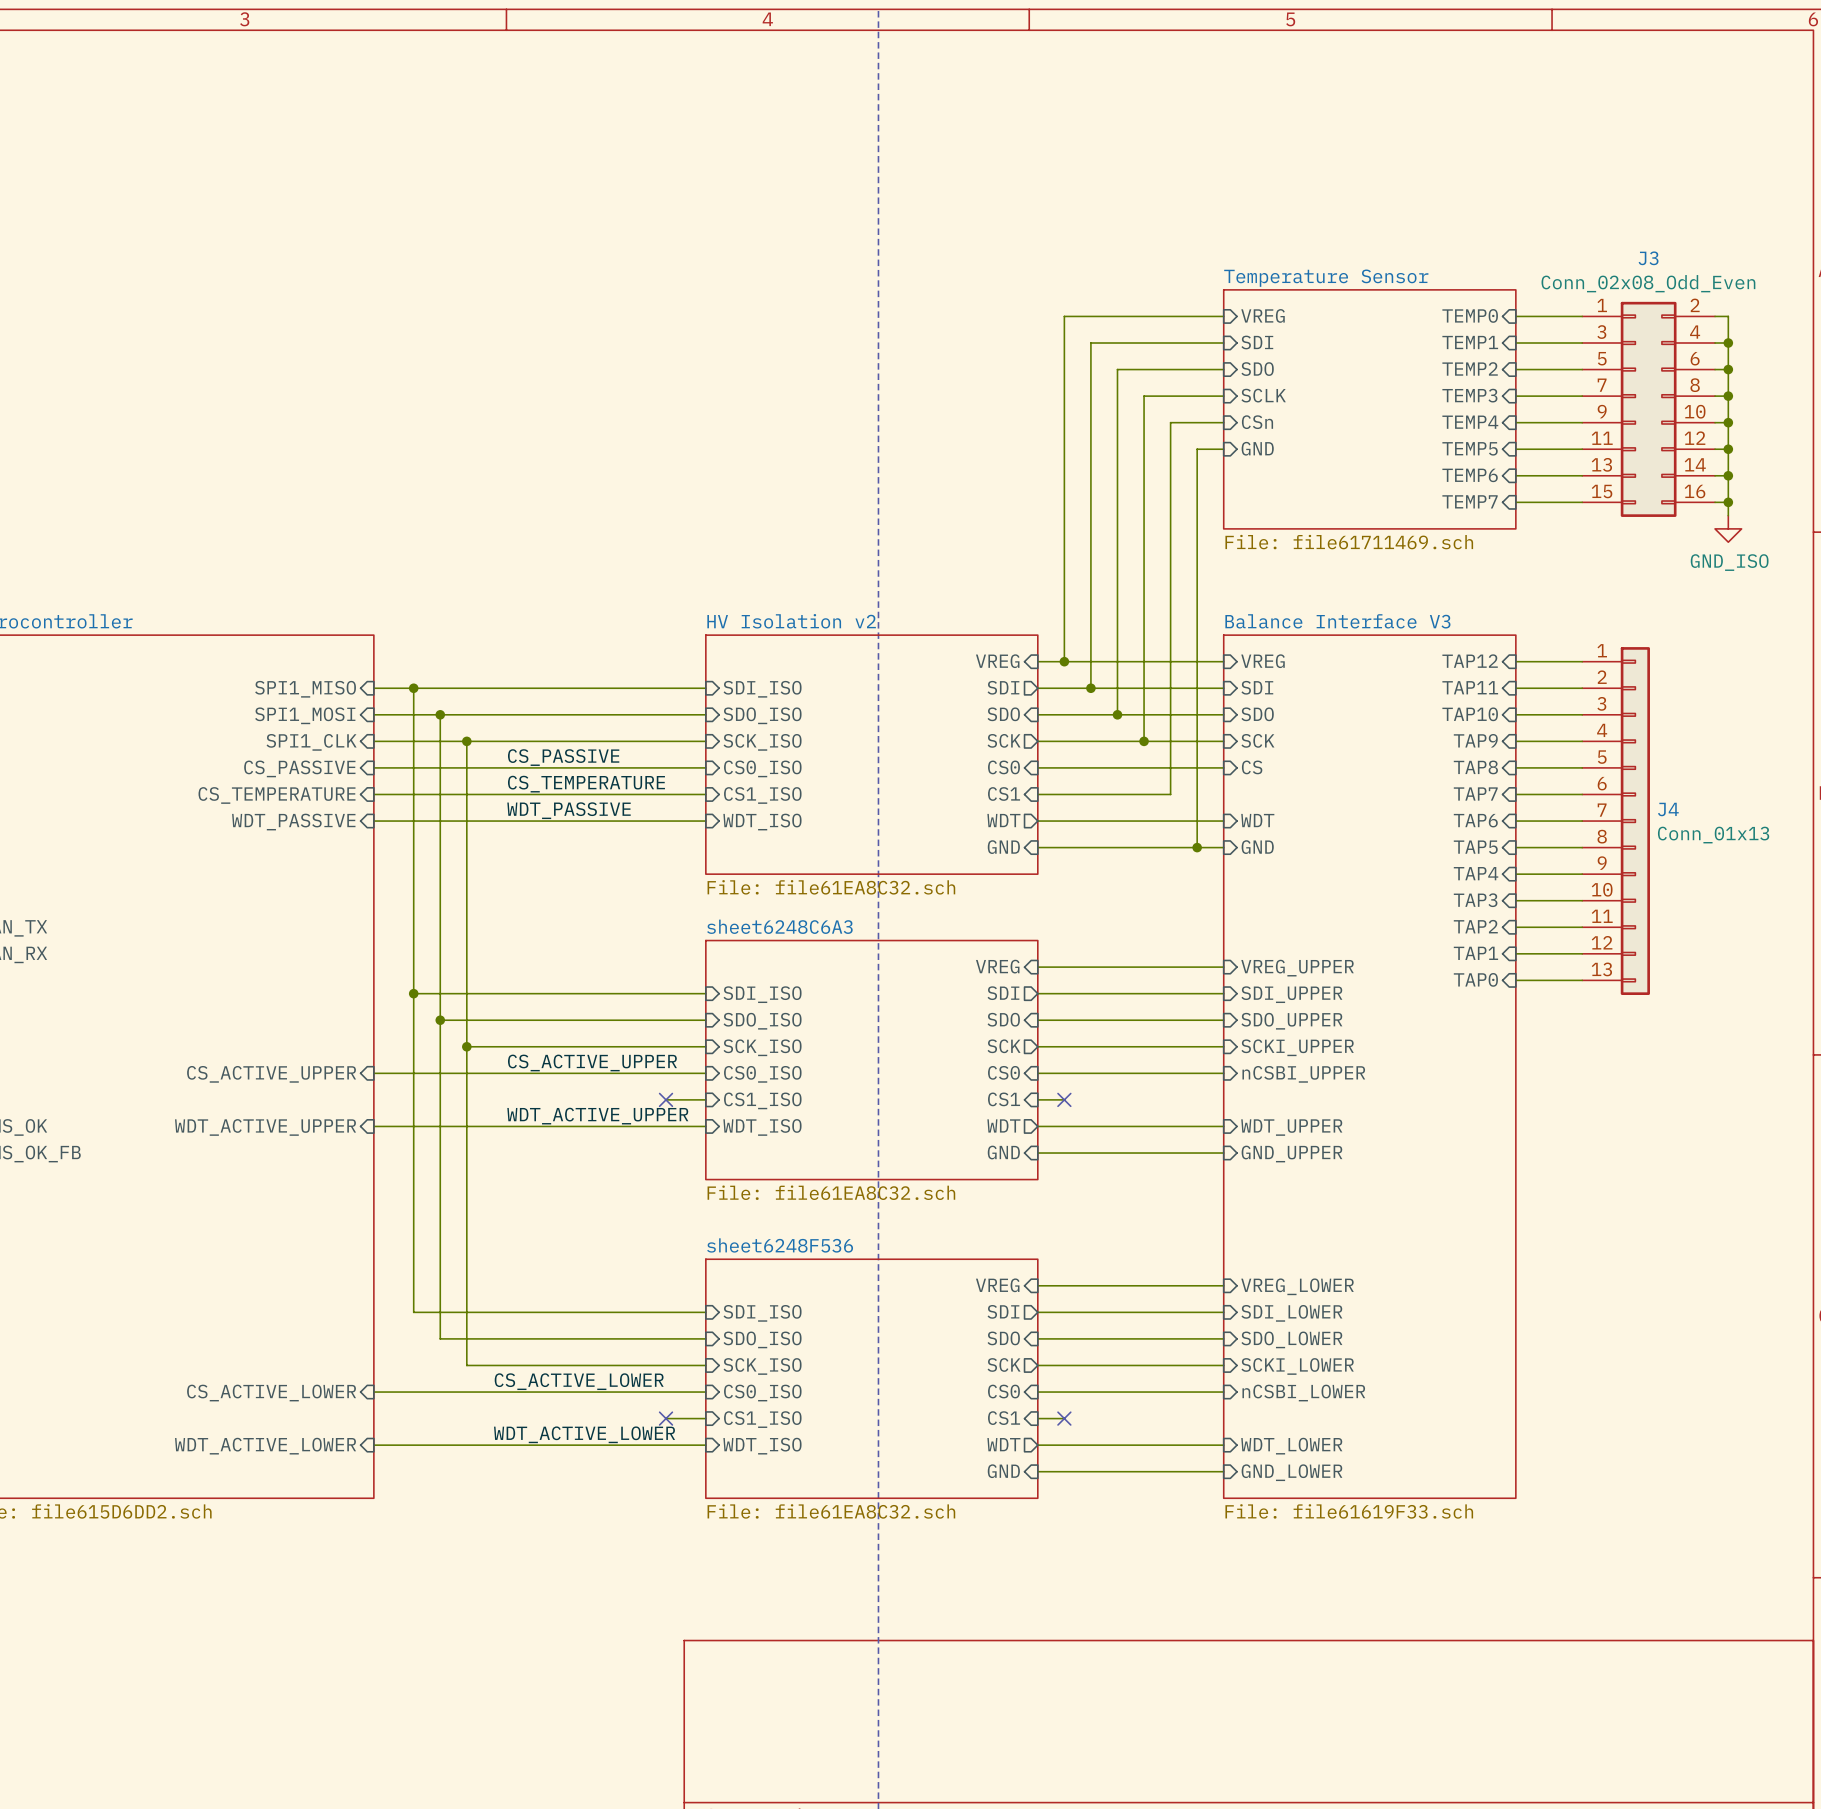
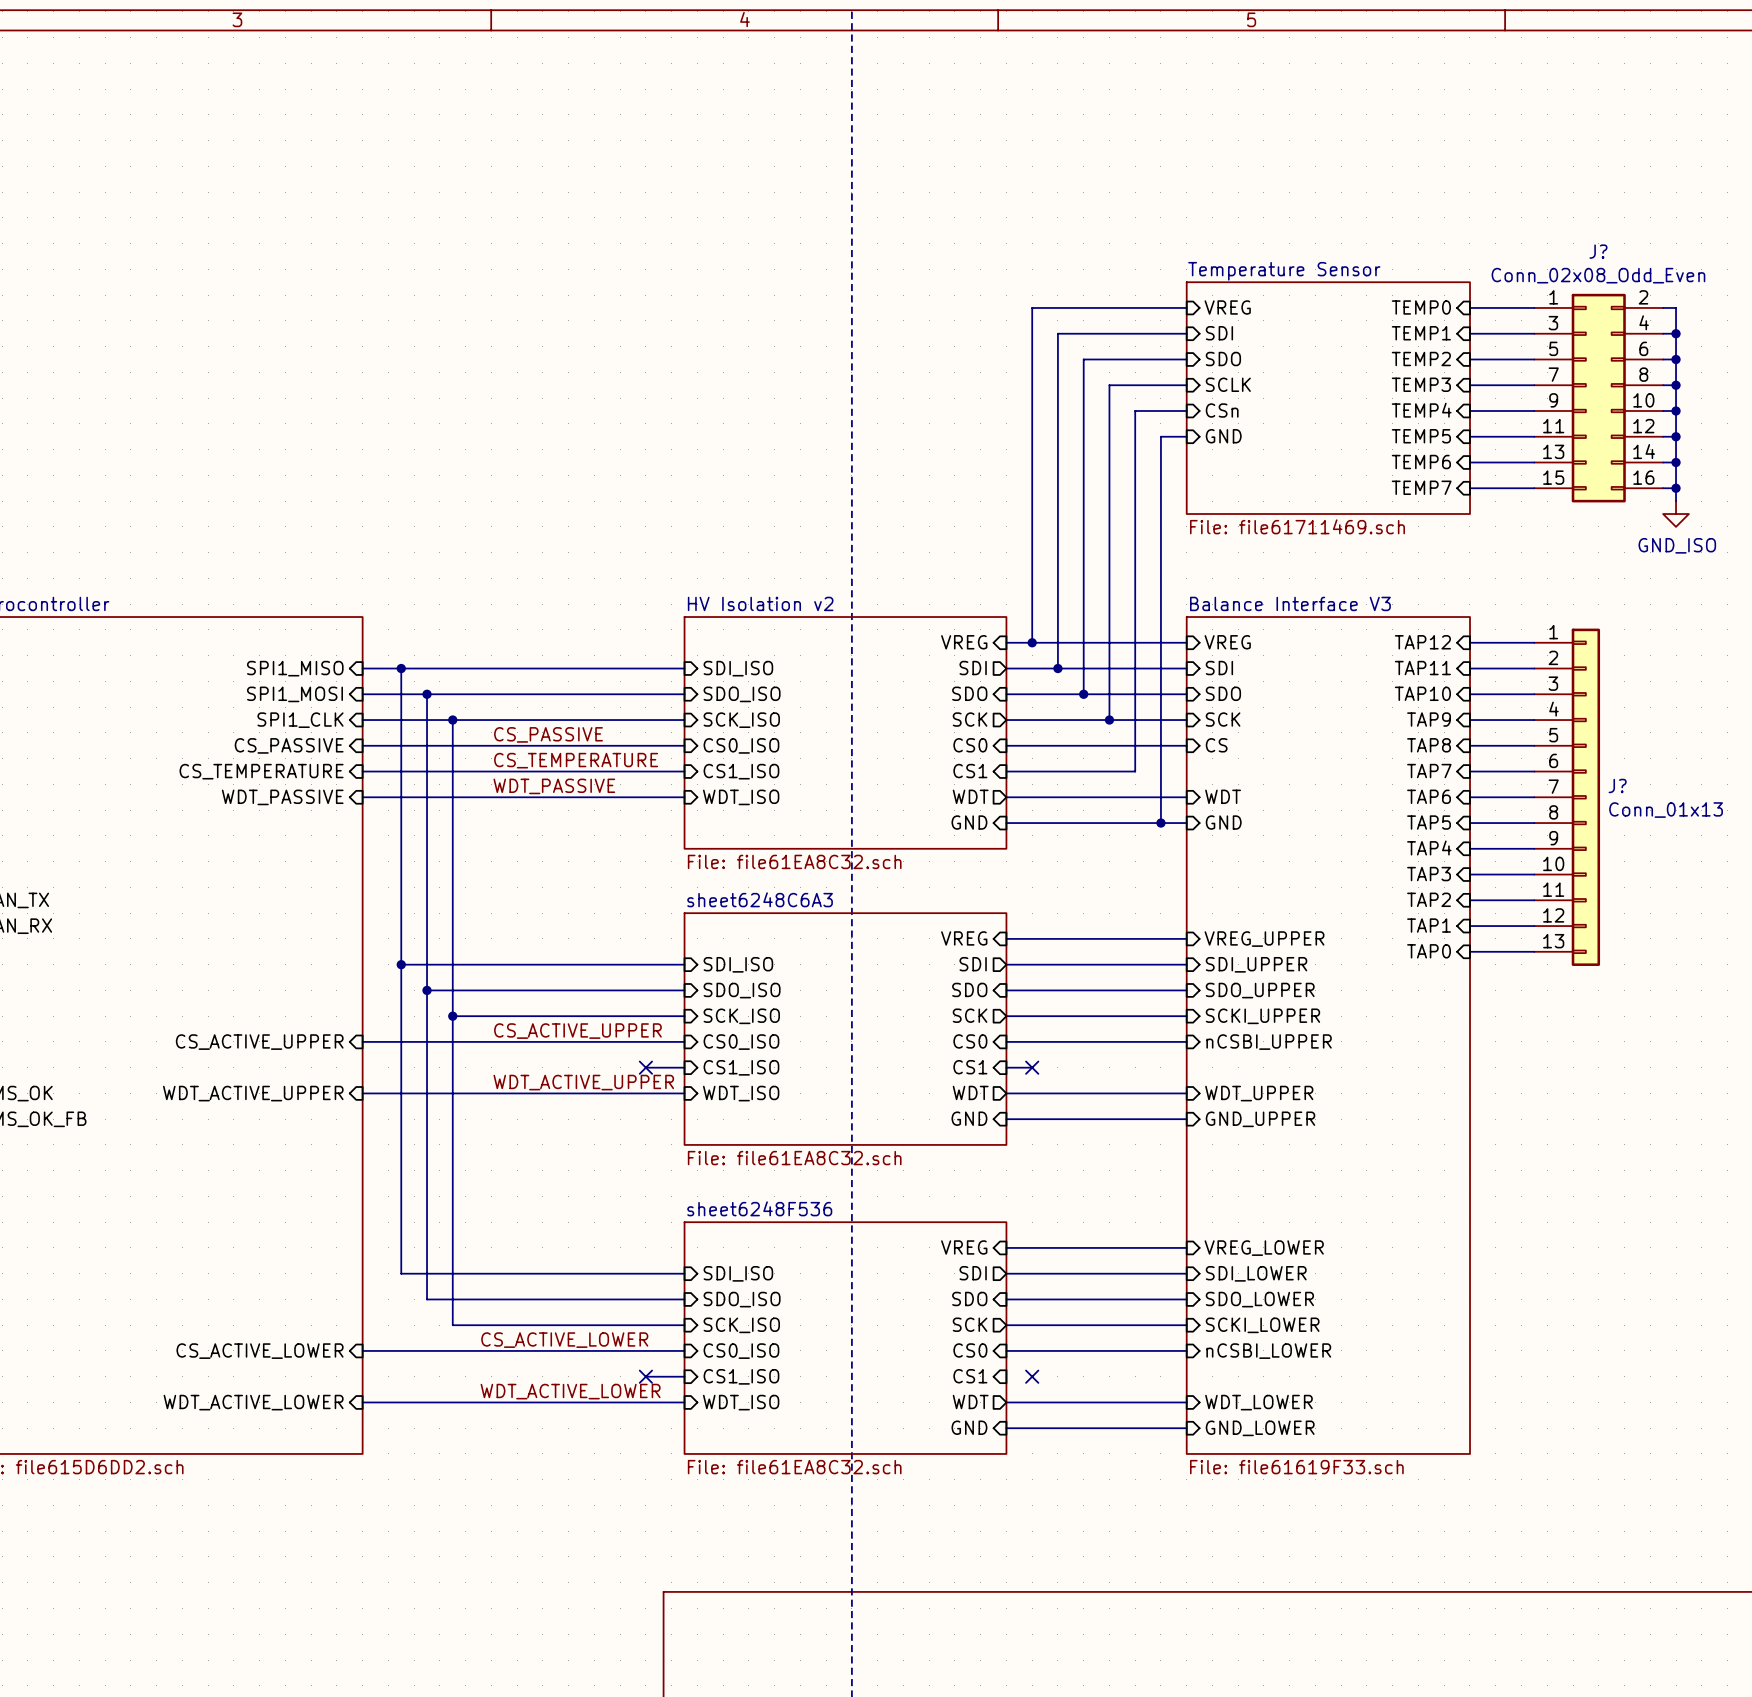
J3 name: J3 (1648, 258) -> J? (1598, 251)
J4 name: J4 (1668, 809) -> J? (1617, 785)
wire: (1037, 1418) (1064, 1418) -> none

